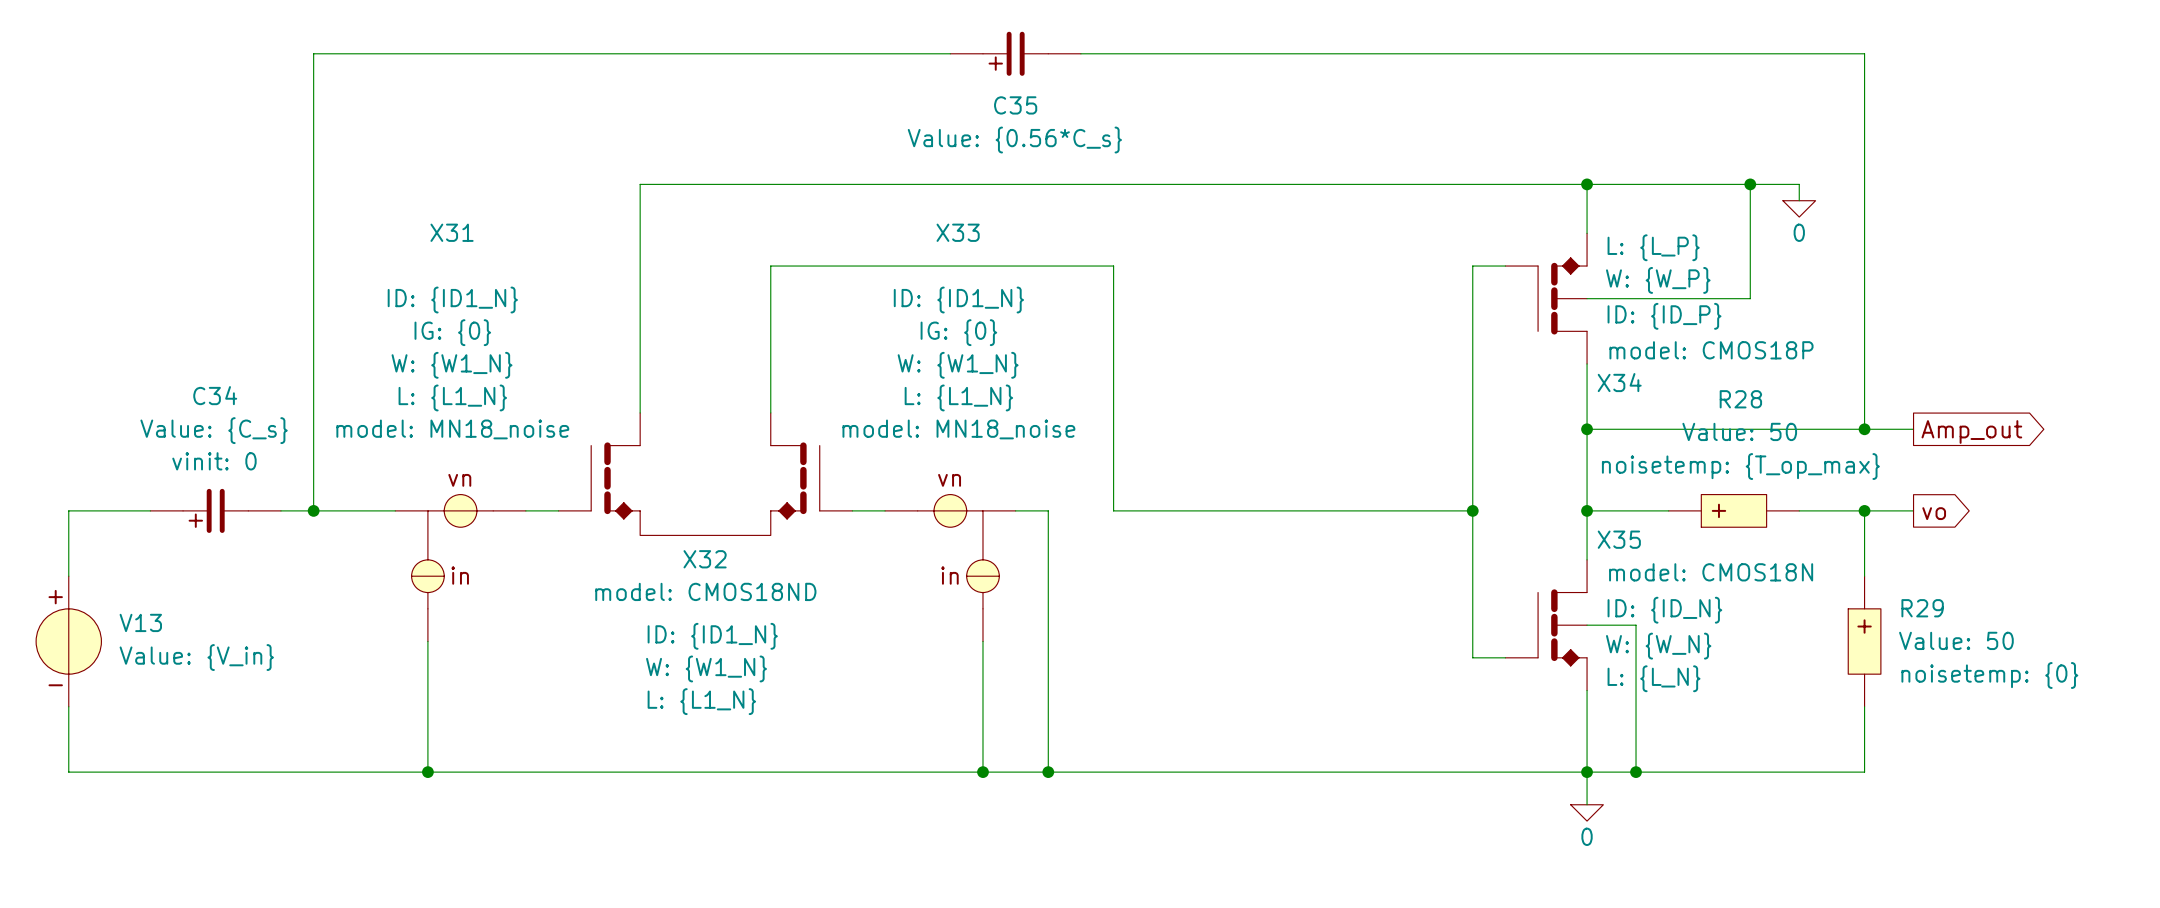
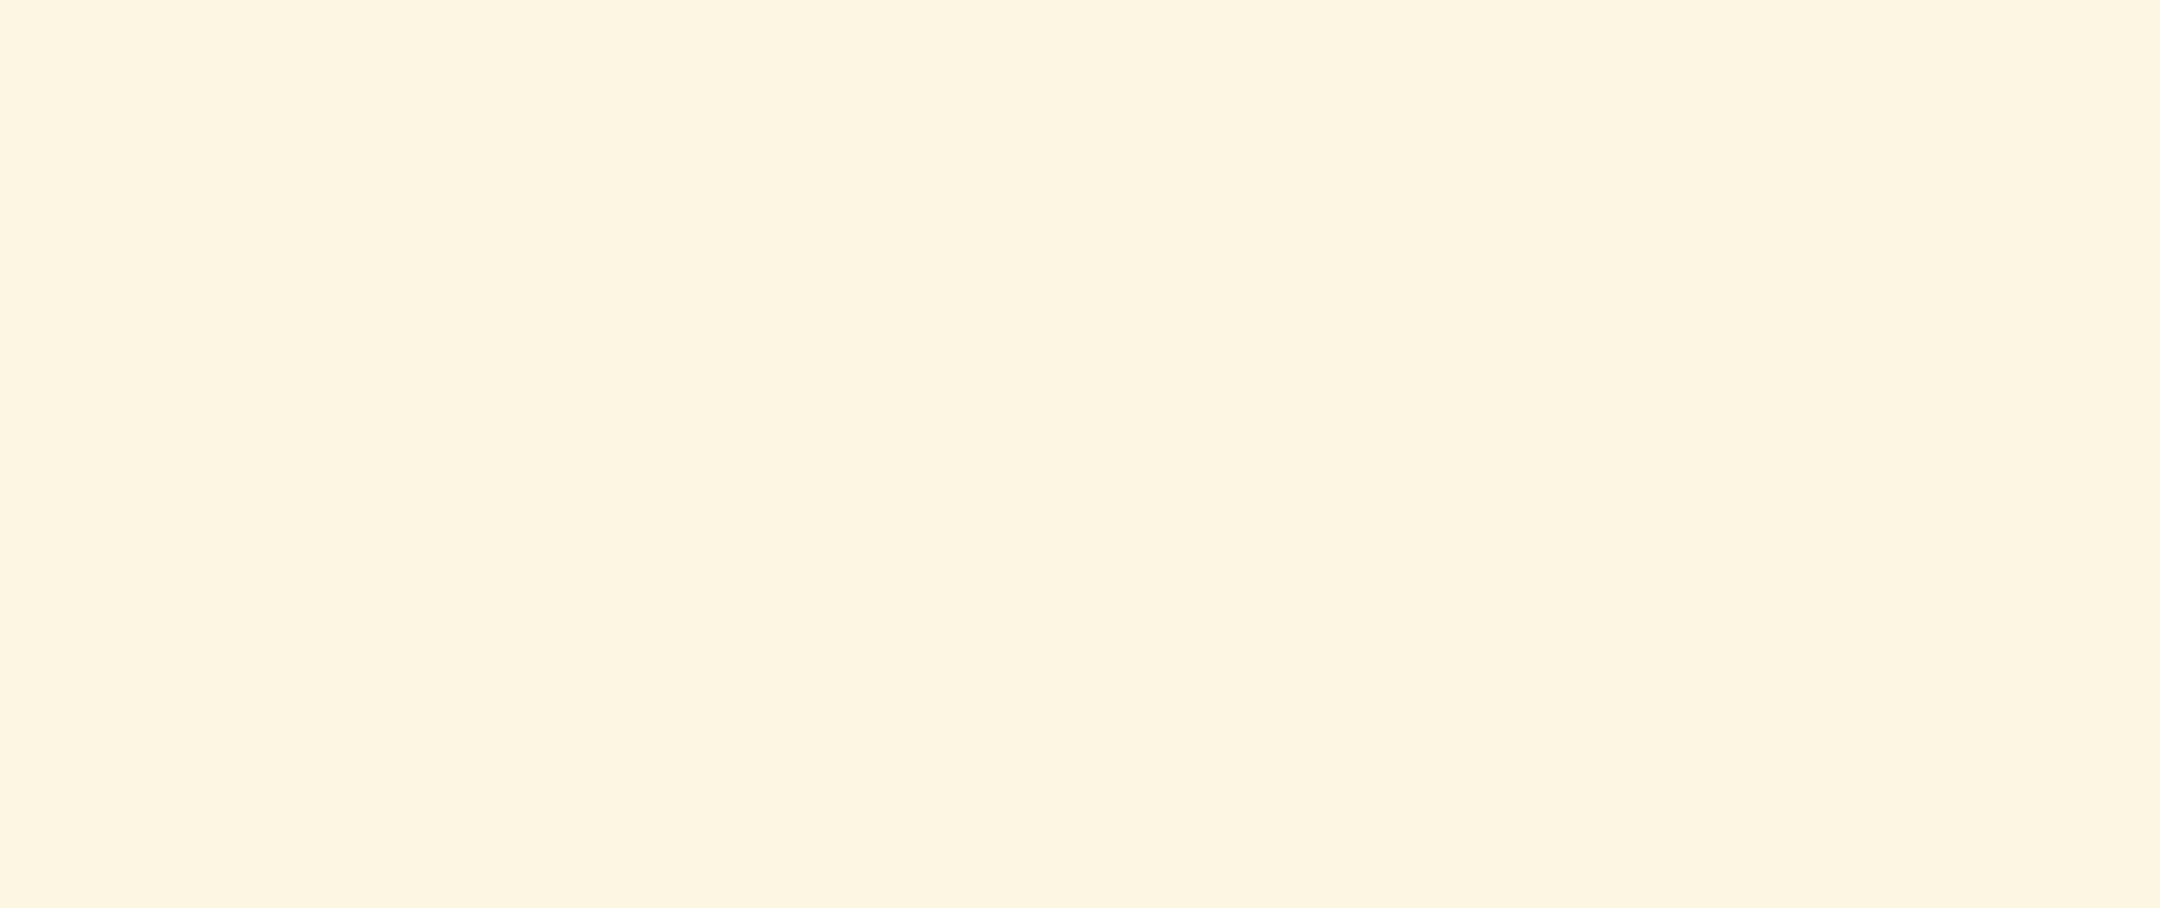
wire: (950, 53) (313, 53) (313, 510) -> none
C35: Value: {0.56*C_s} (1015, 53) -> none
wire: (1080, 53) (1864, 53) (1864, 429) -> none
wire: (1587, 184) (1587, 233) -> none
junction: (1587, 184) -> none
wire: (1750, 184) (1750, 298) (1587, 298) -> none
junction: (1750, 184) -> none
wire: (1799, 200) (1799, 184) (640, 184) (640, 412) -> none
power symbol: 0 (1799, 208) -> none
wire: (1505, 266) (1472, 266) (1472, 657) (1505, 657) -> none
X34: (1546, 298) -> none
wire: (1587, 363) (1587, 559) -> none
wire: (770, 412) (770, 266) (1113, 266) (1113, 510) (1472, 510) -> none
wire: (1587, 429) (1913, 429) -> none
junction: (1587, 429) -> none
junction: (1864, 429) -> none
global label: Amp_out (1971, 432) -> none
X32: (705, 474) -> none
wire: (150, 510) (68, 510) (68, 576) -> none
C34: Value: {C_s} (215, 510) -> none
wire: (280, 510) (395, 510) -> none
junction: (313, 510) -> none
wire: (525, 510) (558, 510) -> none
wire: (852, 510) (885, 510) -> none
wire: (1015, 510) (1048, 510) (1048, 772) -> none
junction: (1472, 510) -> none
wire: (1587, 510) (1668, 510) -> none
junction: (1587, 510) -> none
R28: Value: 50 (1733, 510) -> none
wire: (1799, 510) (1913, 510) -> none
wire: (1864, 510) (1864, 576) -> none
junction: (1864, 510) -> none
global label: vo (1934, 513) -> none
X31: (460, 568) -> none
X33: (950, 568) -> none
X35: (1546, 625) -> none
wire: (1587, 625) (1636, 625) (1636, 772) -> none
V13: Value: {V_in} (68, 641) -> none
wire: (427, 641) (427, 772) -> none
wire: (982, 641) (982, 772) -> none
R29: Value: 50 (1864, 641) -> none
wire: (1587, 690) (1587, 804) -> none
wire: (68, 706) (68, 772) (1864, 772) (1864, 706) -> none
junction: (427, 772) -> none
junction: (982, 772) -> none
junction: (1048, 772) -> none
junction: (1587, 772) -> none
junction: (1636, 772) -> none
power symbol: 0 (1587, 812) -> none

